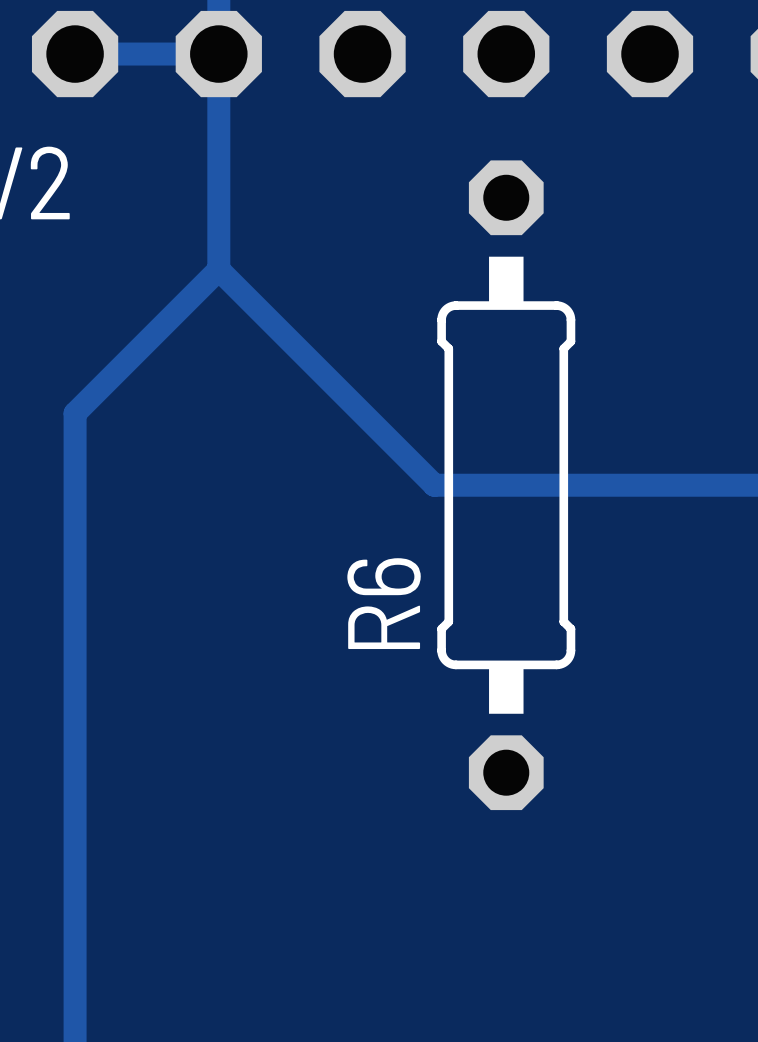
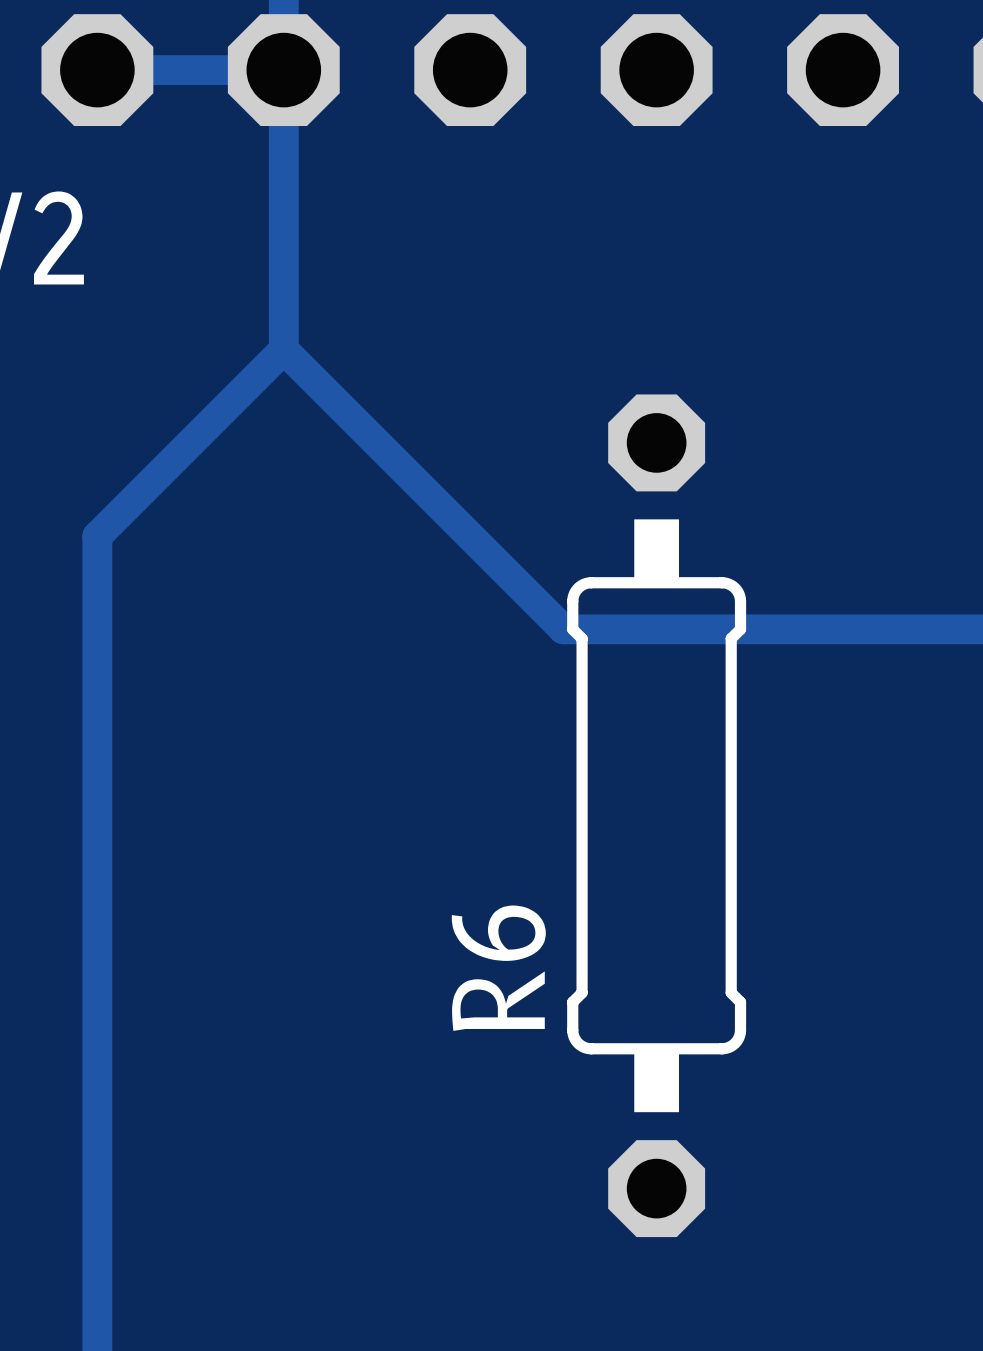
R6 position: (506, 485) -> (656, 815)

